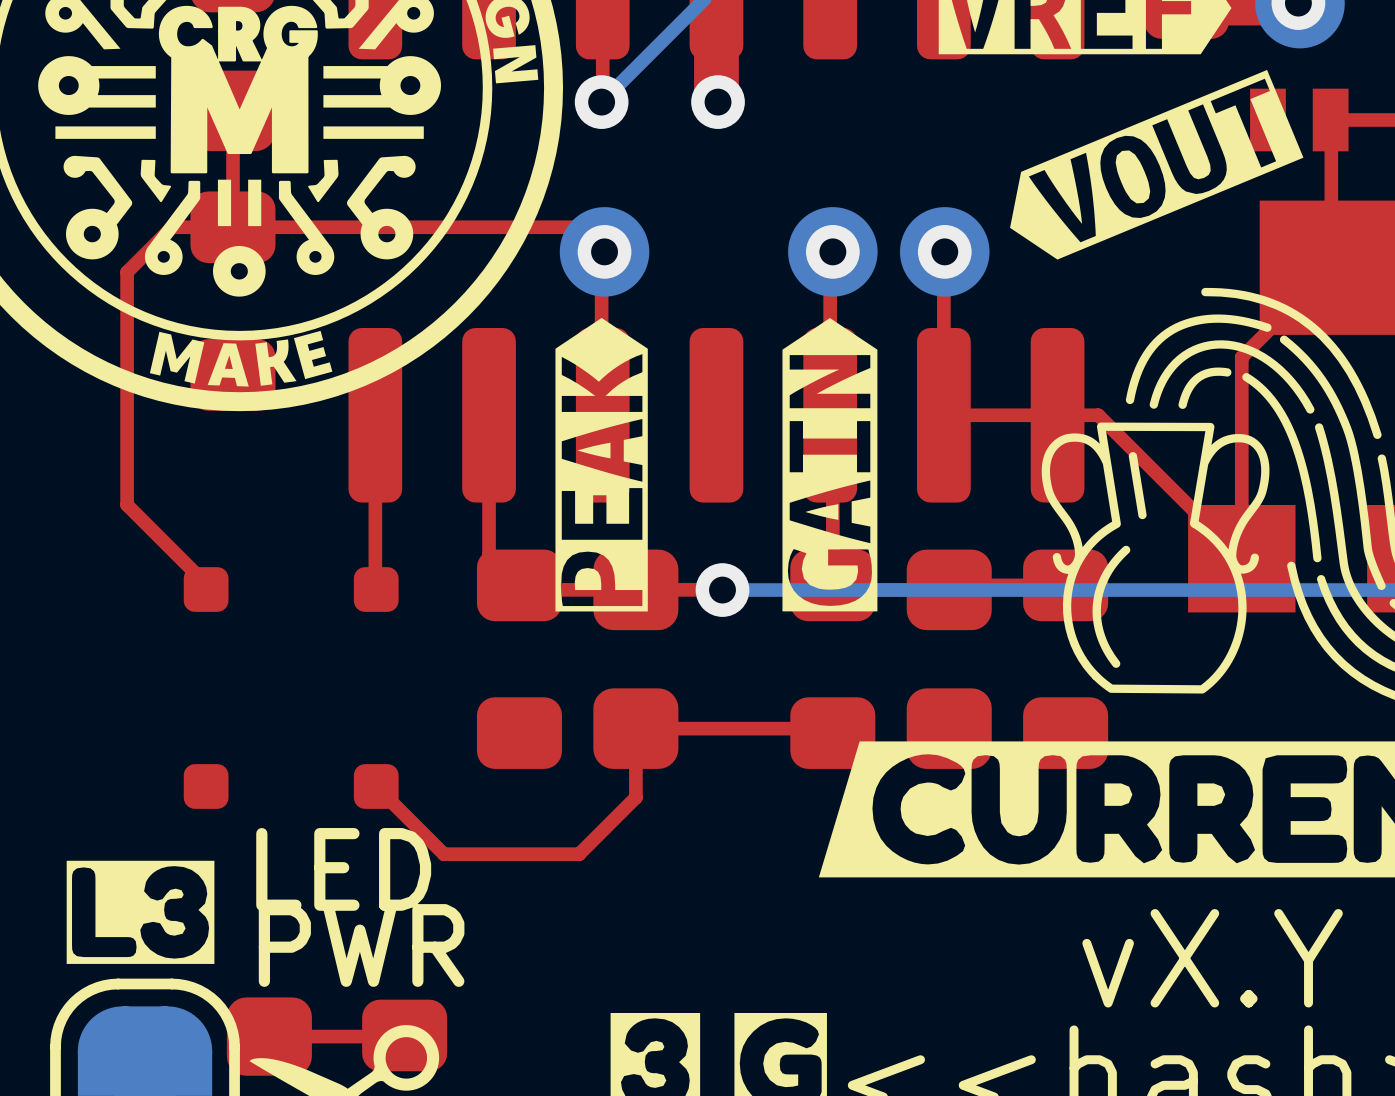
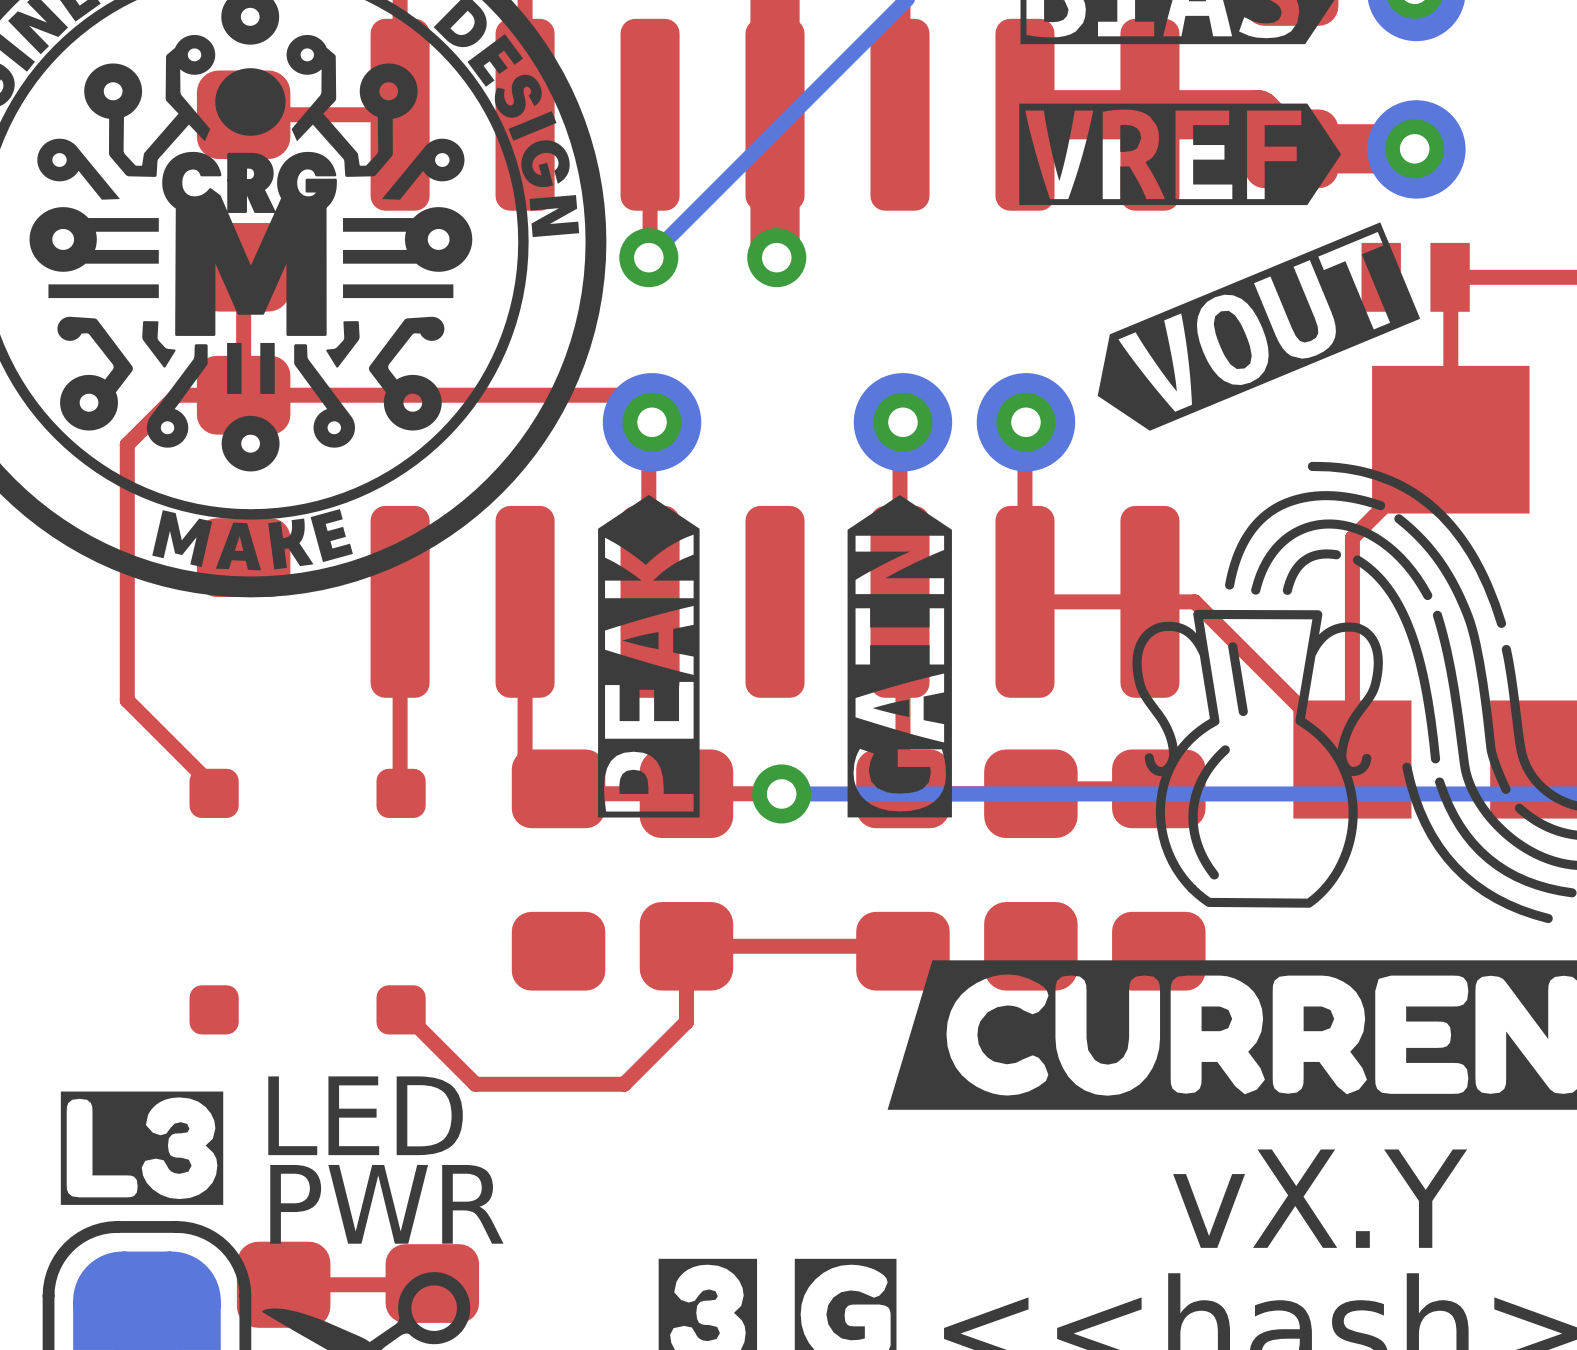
text position: LED (343, 869) -> LED (365, 1115)
text position: PWR (361, 945) -> PWR (386, 1204)

